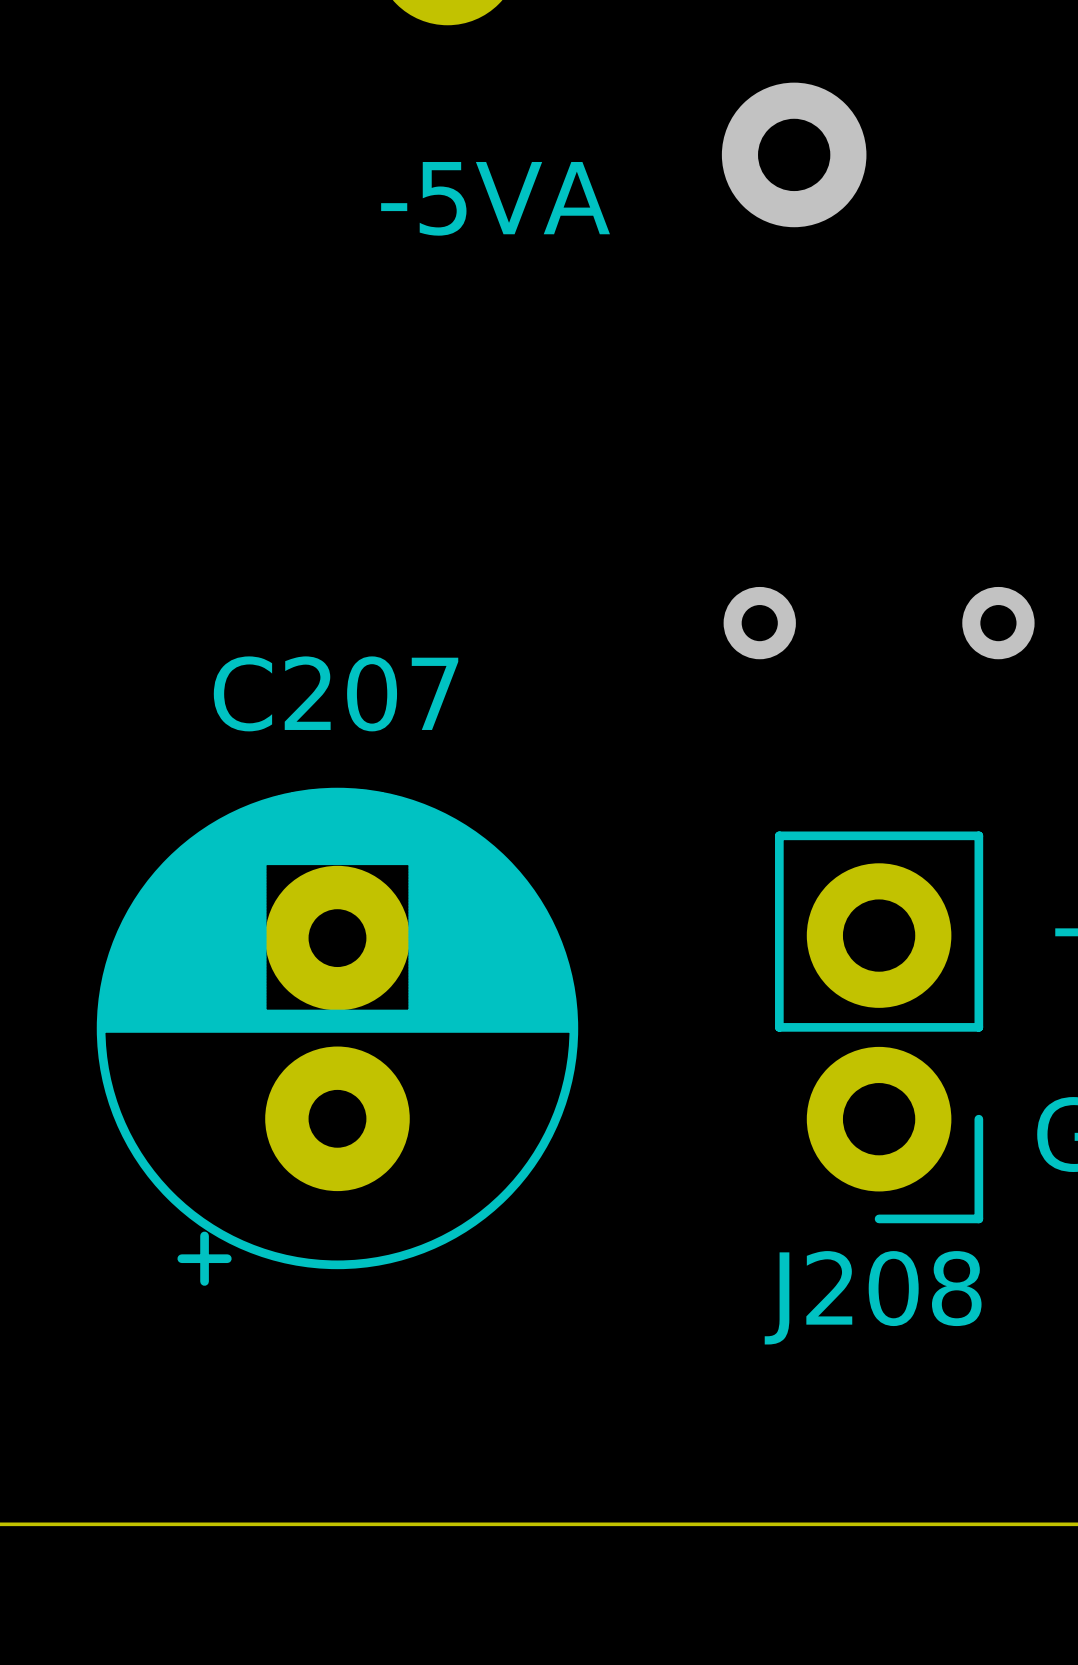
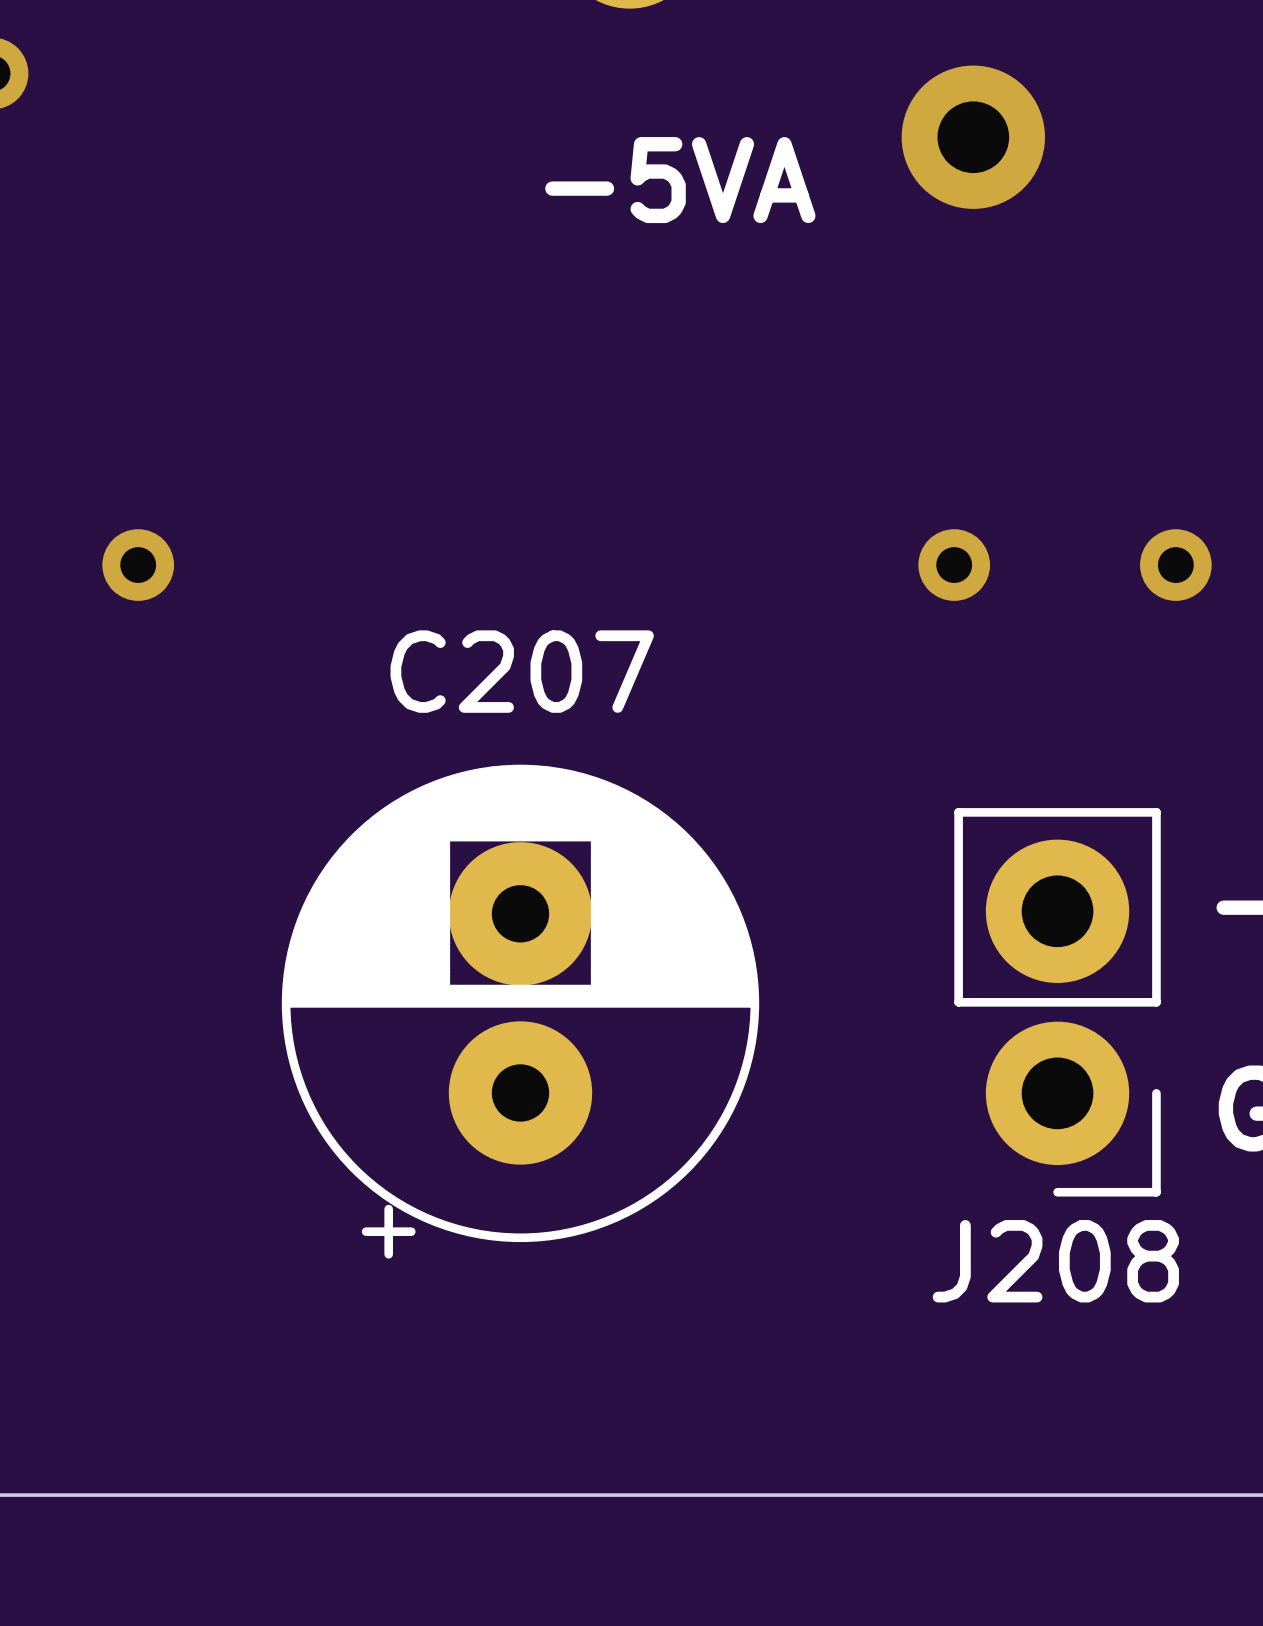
via position: (759, 623) -> (954, 565)
via position: (998, 623) -> (1175, 565)

